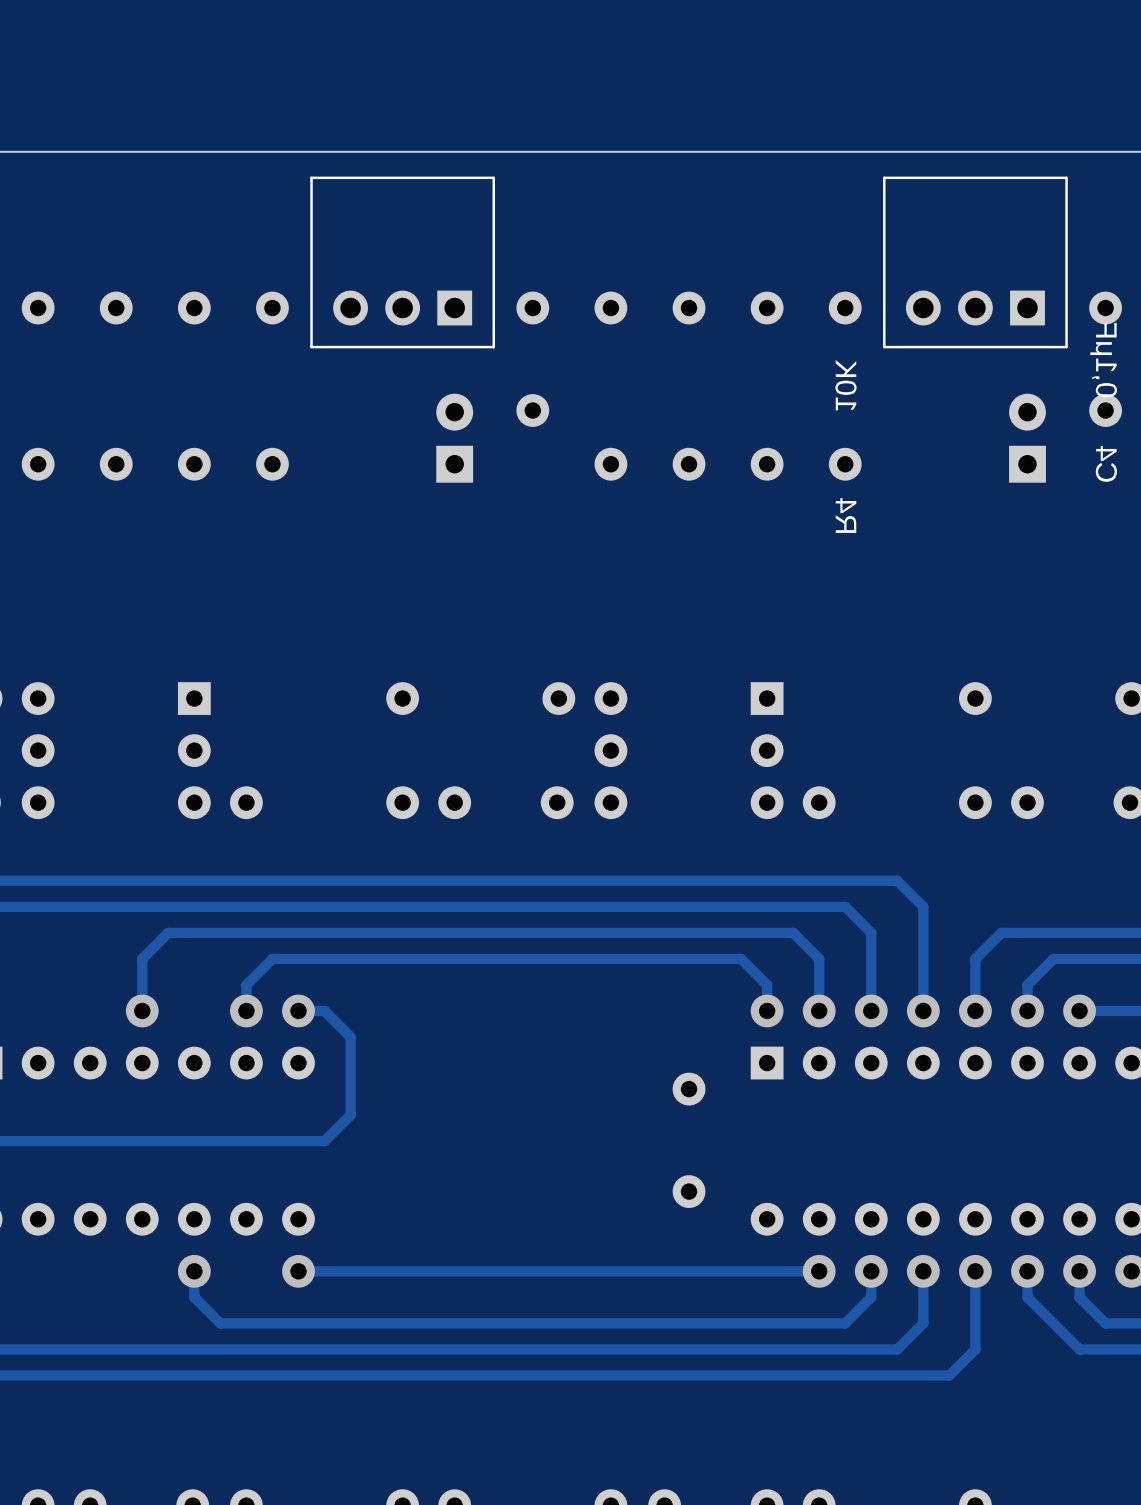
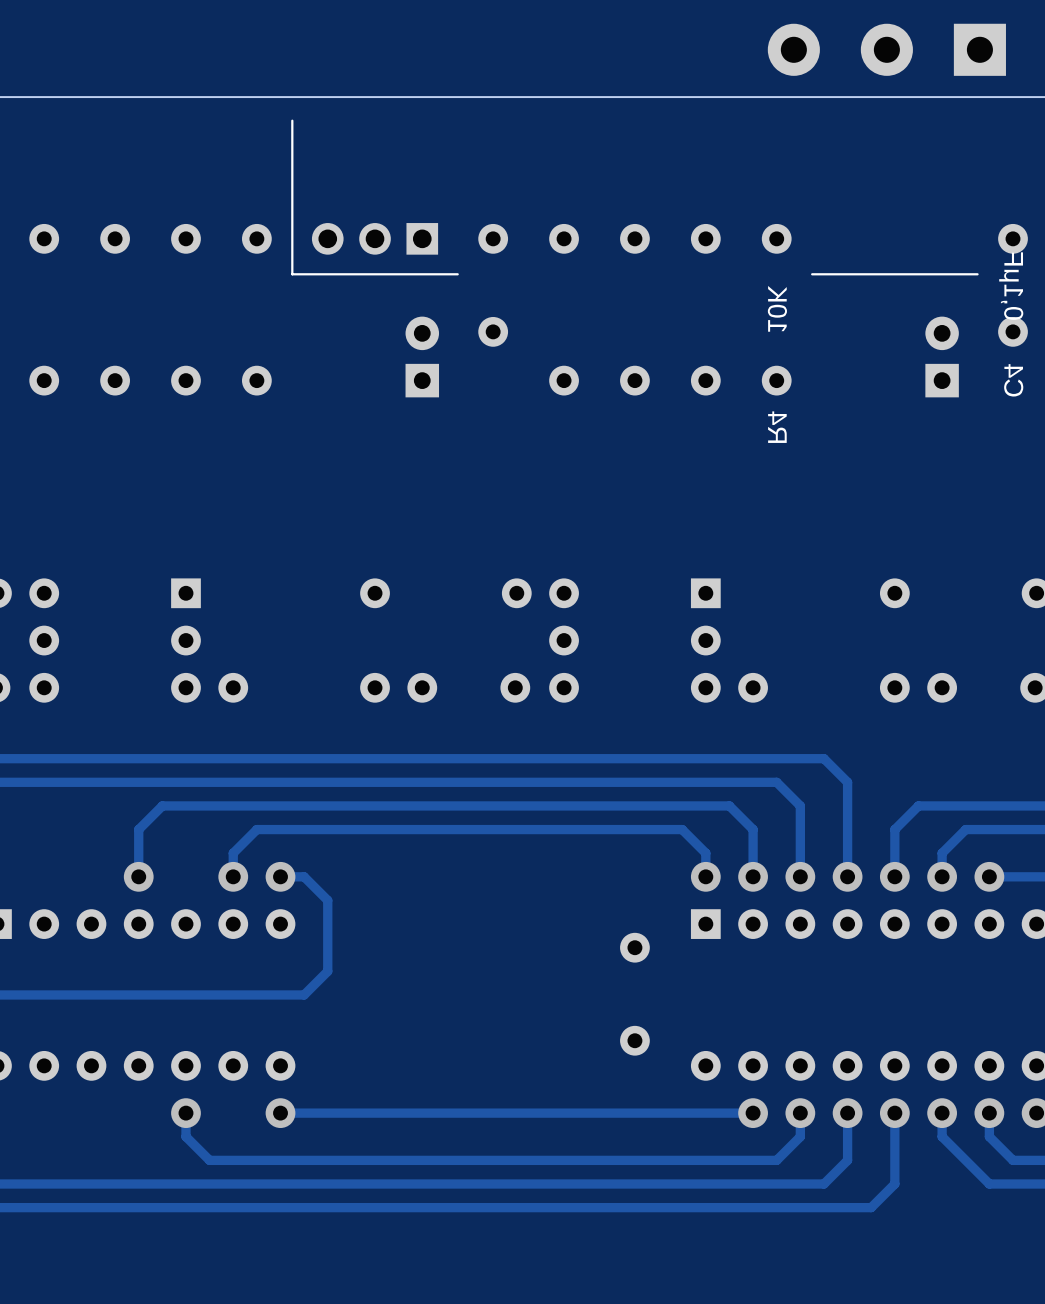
part: none -> (886, 49)
line: (311, 177) (493, 177) (493, 347) -> none
part: (975, 308) -> none
line: (1066, 347) (1066, 177) (884, 177) (884, 347) -> none

